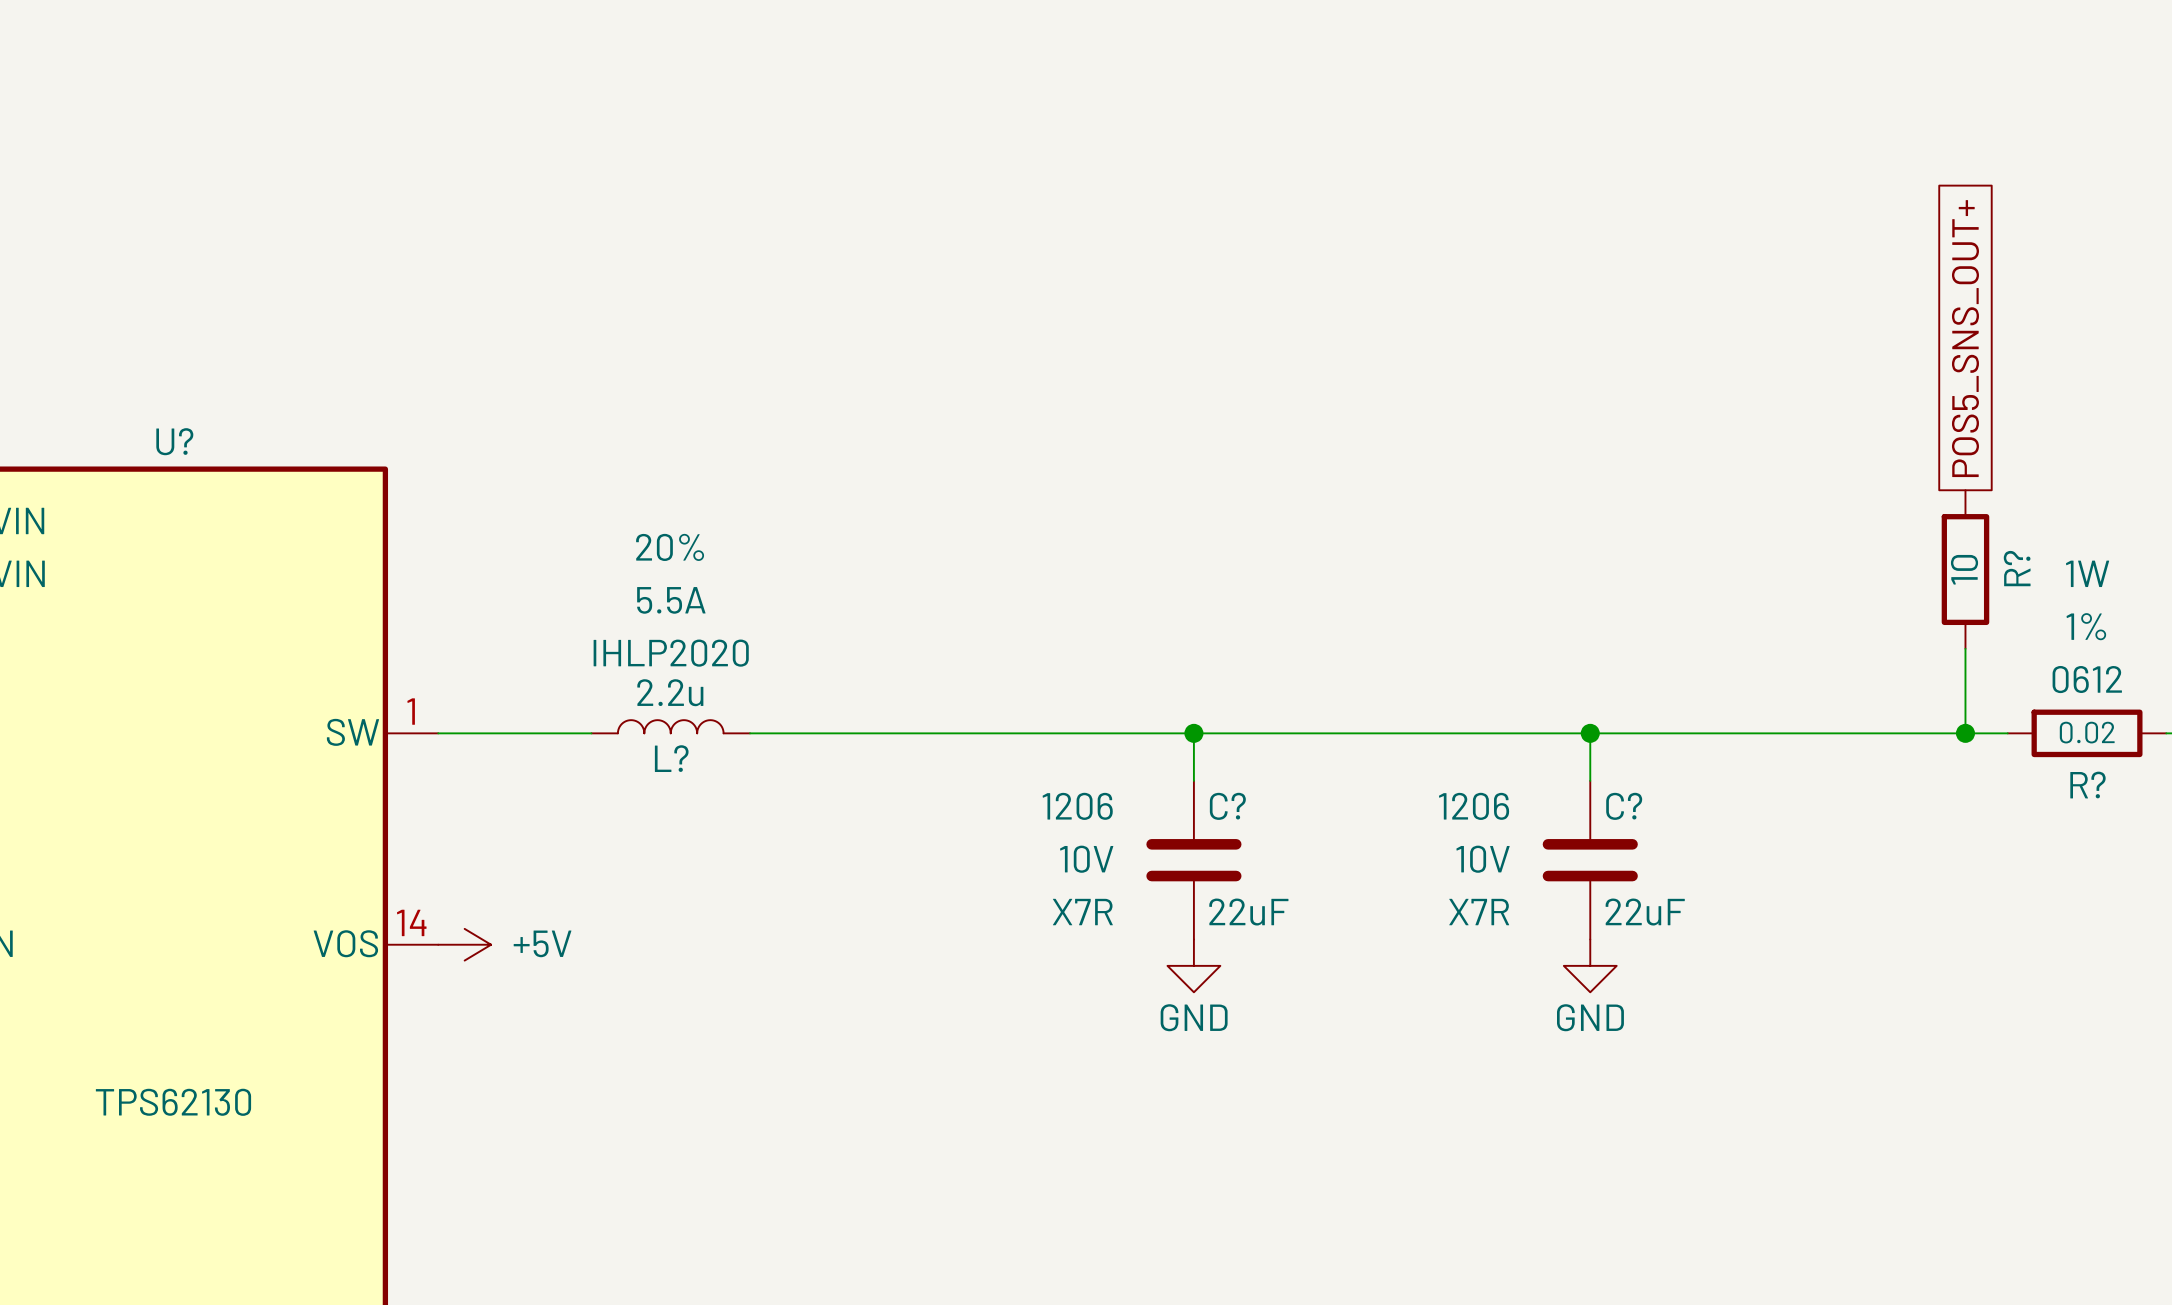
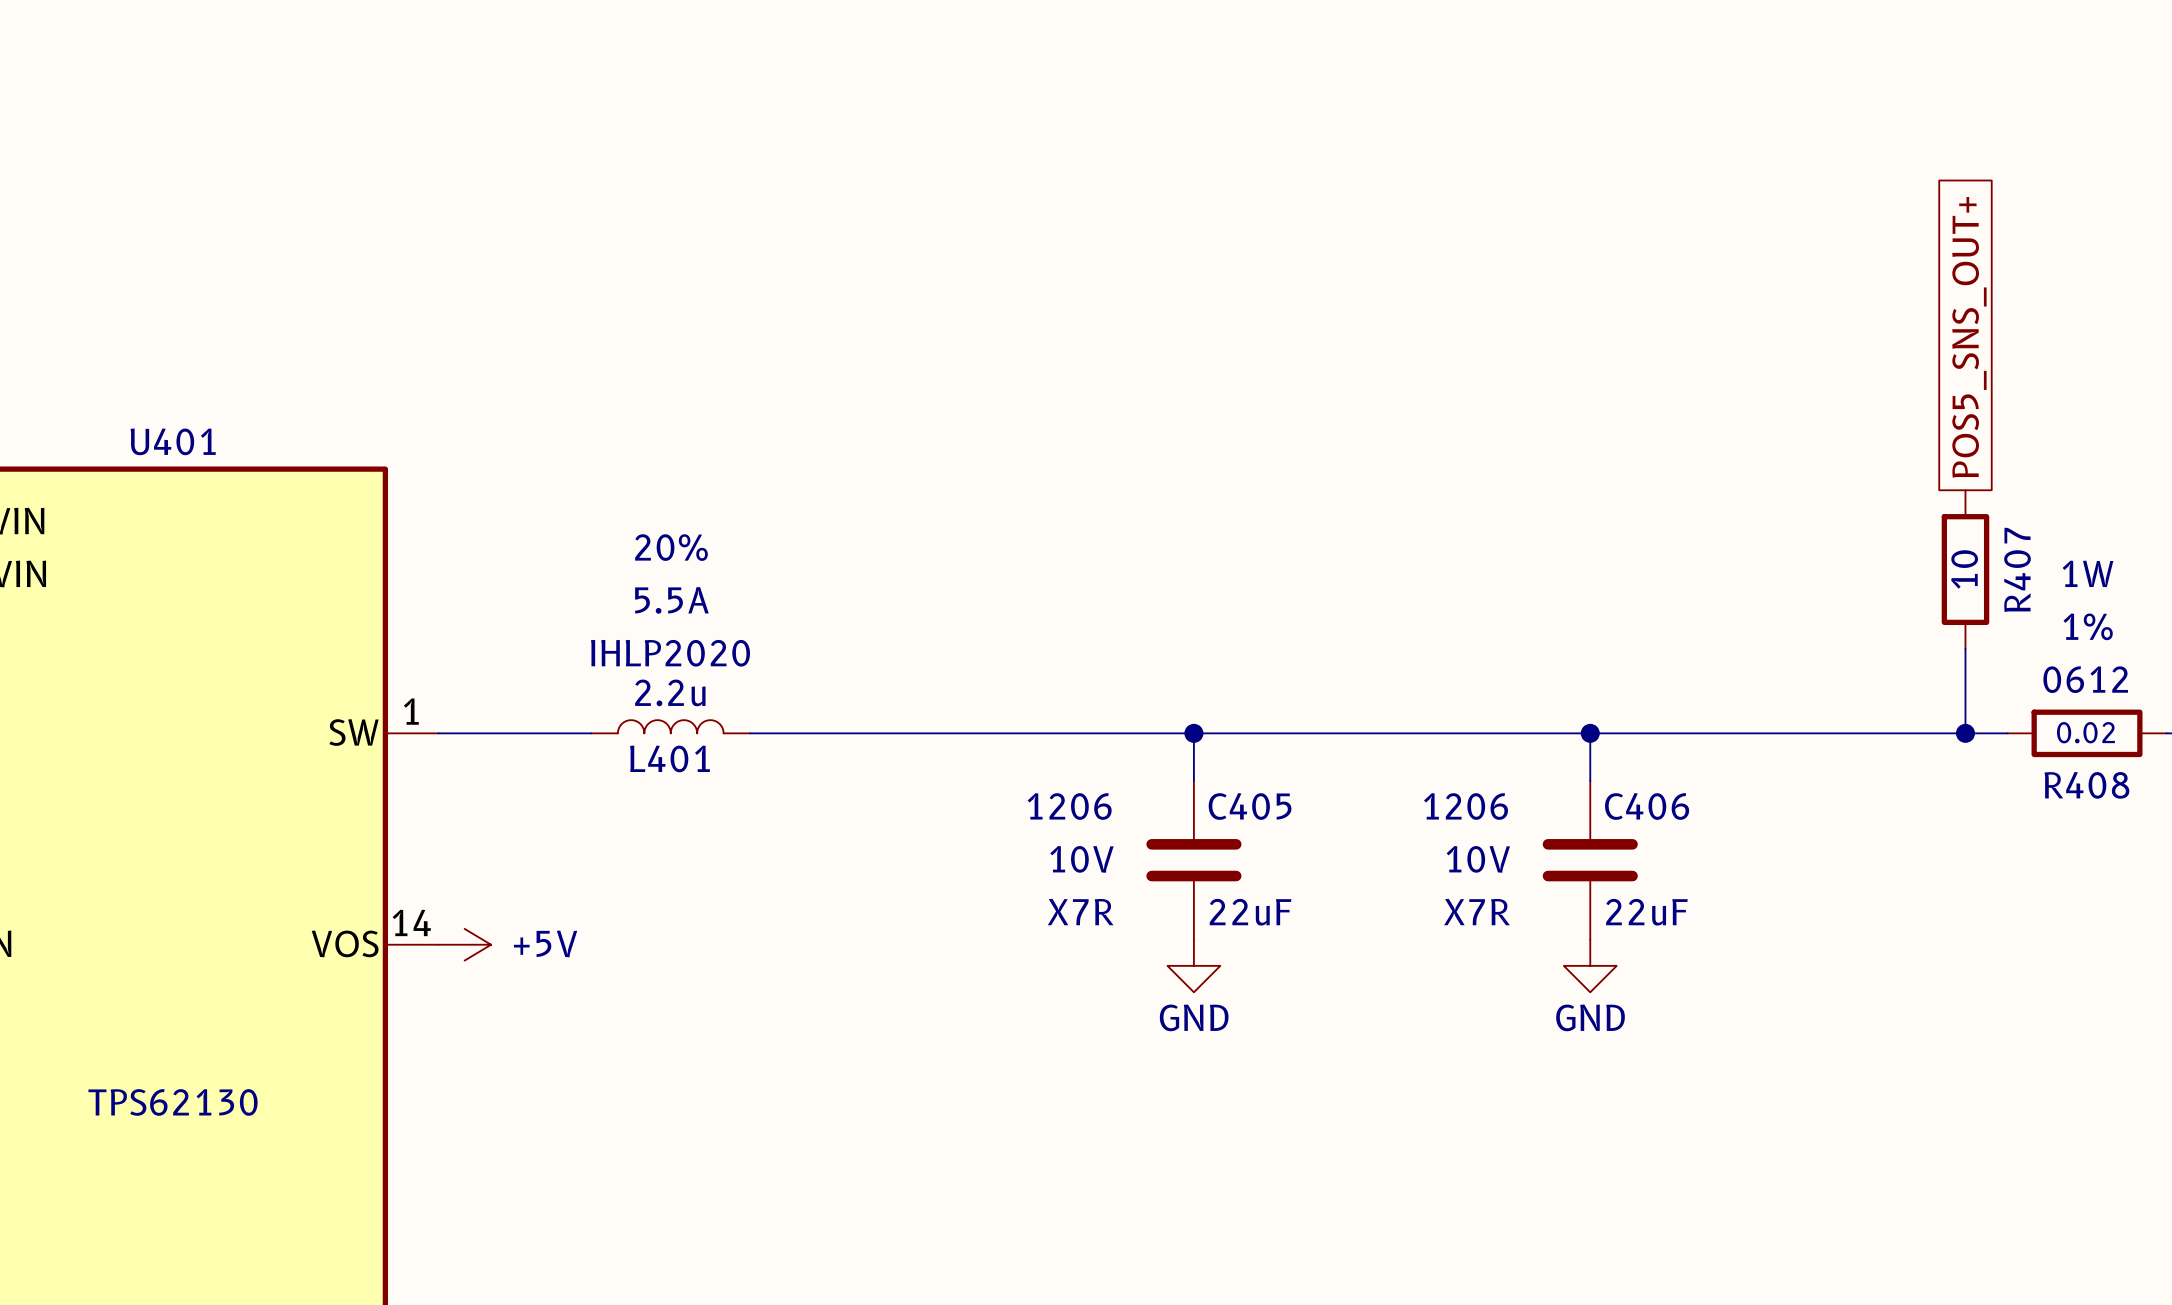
U? name: U? (174, 441) -> U401 (173, 441)
R? name: R? (2017, 568) -> R407 (2017, 569)
L? name: L? (671, 758) -> L401 (669, 758)
R? name: R? (2087, 785) -> R408 (2086, 785)
C? name: C? (1227, 806) -> C405 (1250, 806)
C? name: C? (1624, 806) -> C406 (1647, 806)

